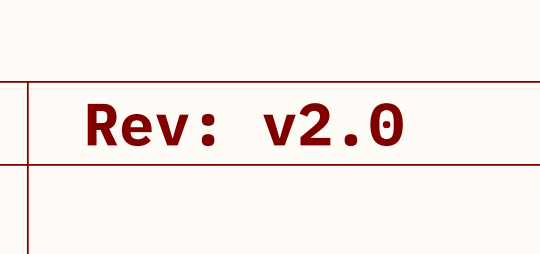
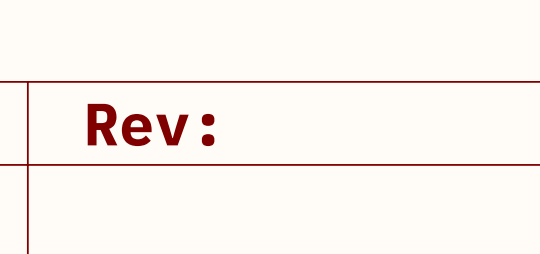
title block: Rev: v2.0 (245, 124) -> Rev: (151, 124)

